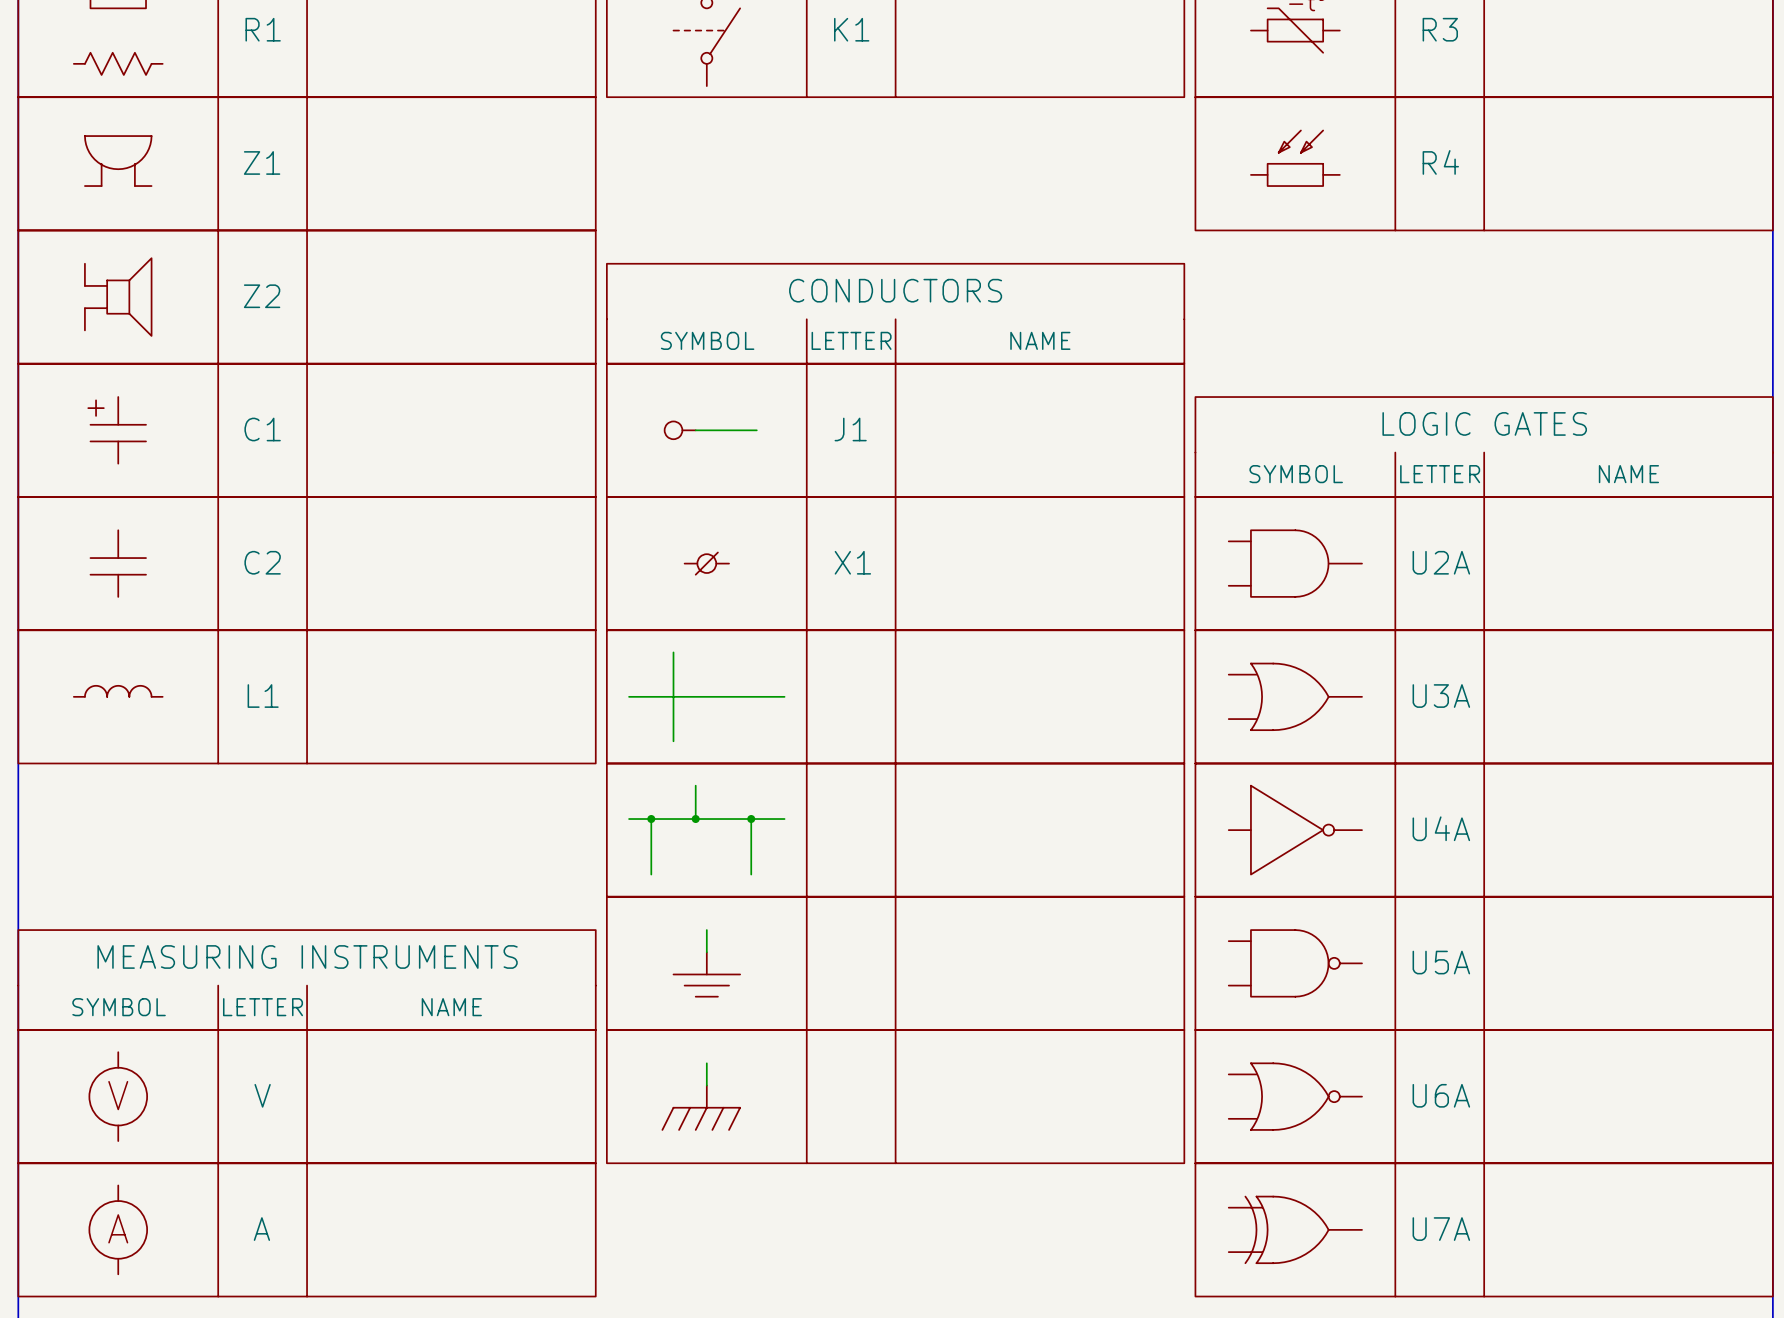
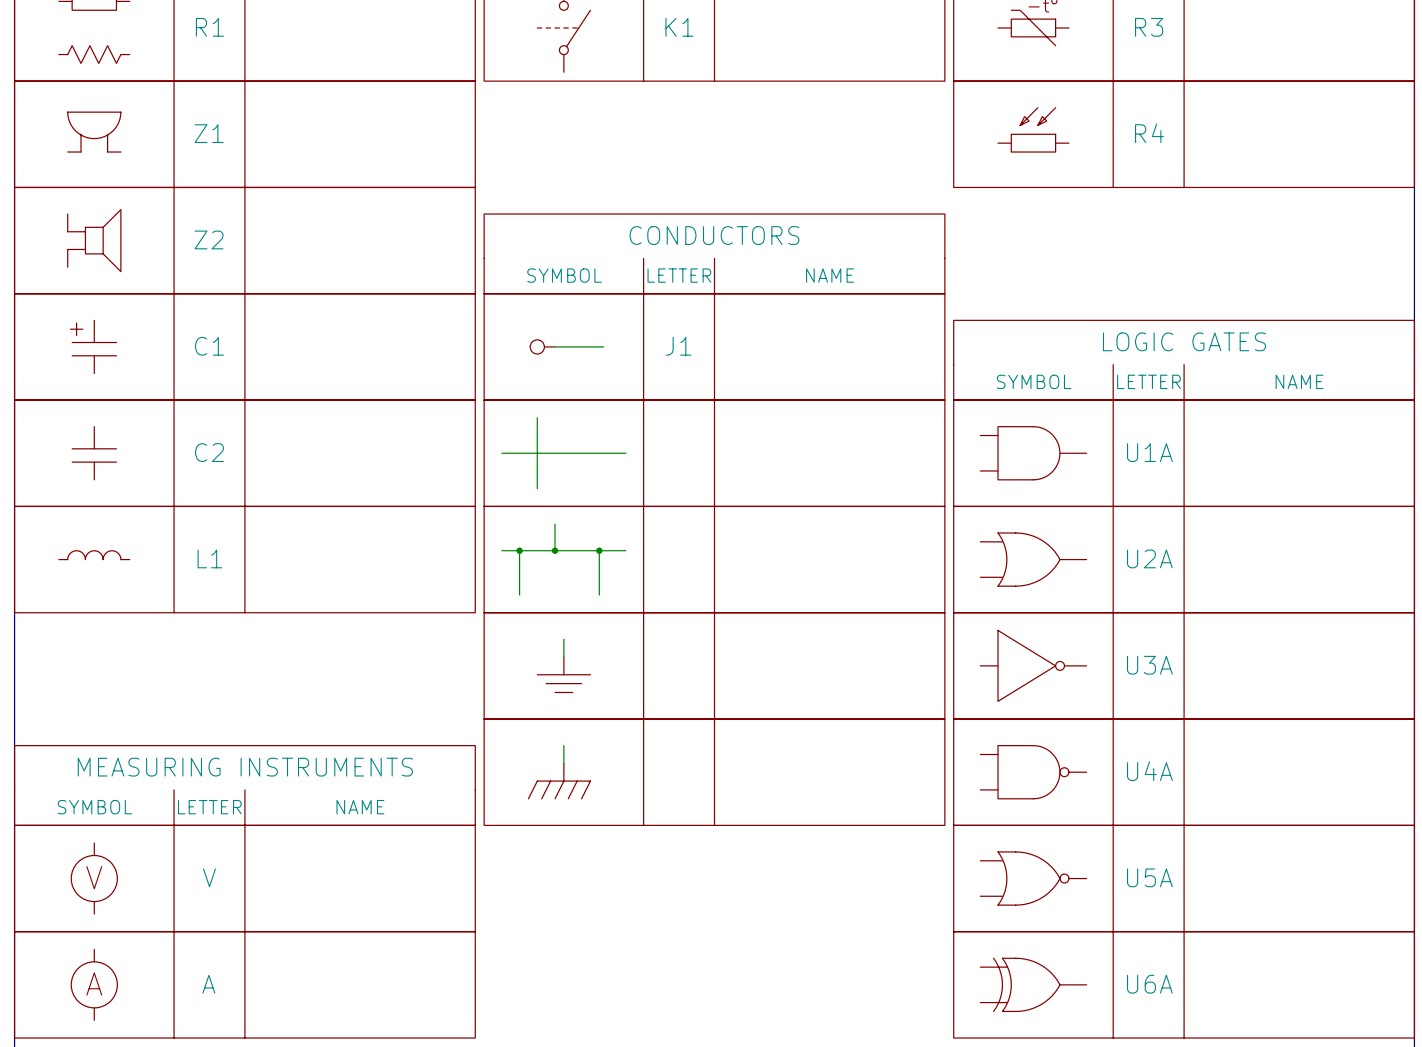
U2A name: U2A (1441, 562) -> U1A (1149, 452)
X1: (706, 563) -> none
wire: (673, 652) (673, 741) -> (537, 417) (537, 488)
junction: none -> (519, 550)
junction: none -> (555, 550)
junction: none -> (599, 550)
wire: (629, 696) (784, 696) -> (501, 453) (625, 453)
U3A name: U3A (1441, 696) -> U2A (1149, 558)
wire: (695, 785) (695, 819) -> (555, 524) (555, 550)
wire: none -> (563, 639) (563, 657)
wire: (629, 819) (784, 819) -> (501, 550) (625, 550)
wire: (651, 819) (651, 874) -> (519, 550) (519, 595)
junction: (651, 819) -> none
junction: (695, 819) -> none
wire: (751, 819) (751, 874) -> (599, 550) (599, 595)
junction: (751, 819) -> none
U4A name: U4A (1441, 828) -> U3A (1149, 665)
part: none -> (563, 674)
part symbol: [673, 952, 741, 997] -> [528, 763, 591, 799]
U5A name: U5A (1441, 962) -> U4A (1149, 771)
wire: (706, 1063) (706, 1085) -> none
U6A name: U6A (1441, 1095) -> U5A (1149, 877)
part: (895, 1096) -> none
part: (701, 1107) -> none
U7A name: U7A (1441, 1229) -> U6A (1149, 984)

